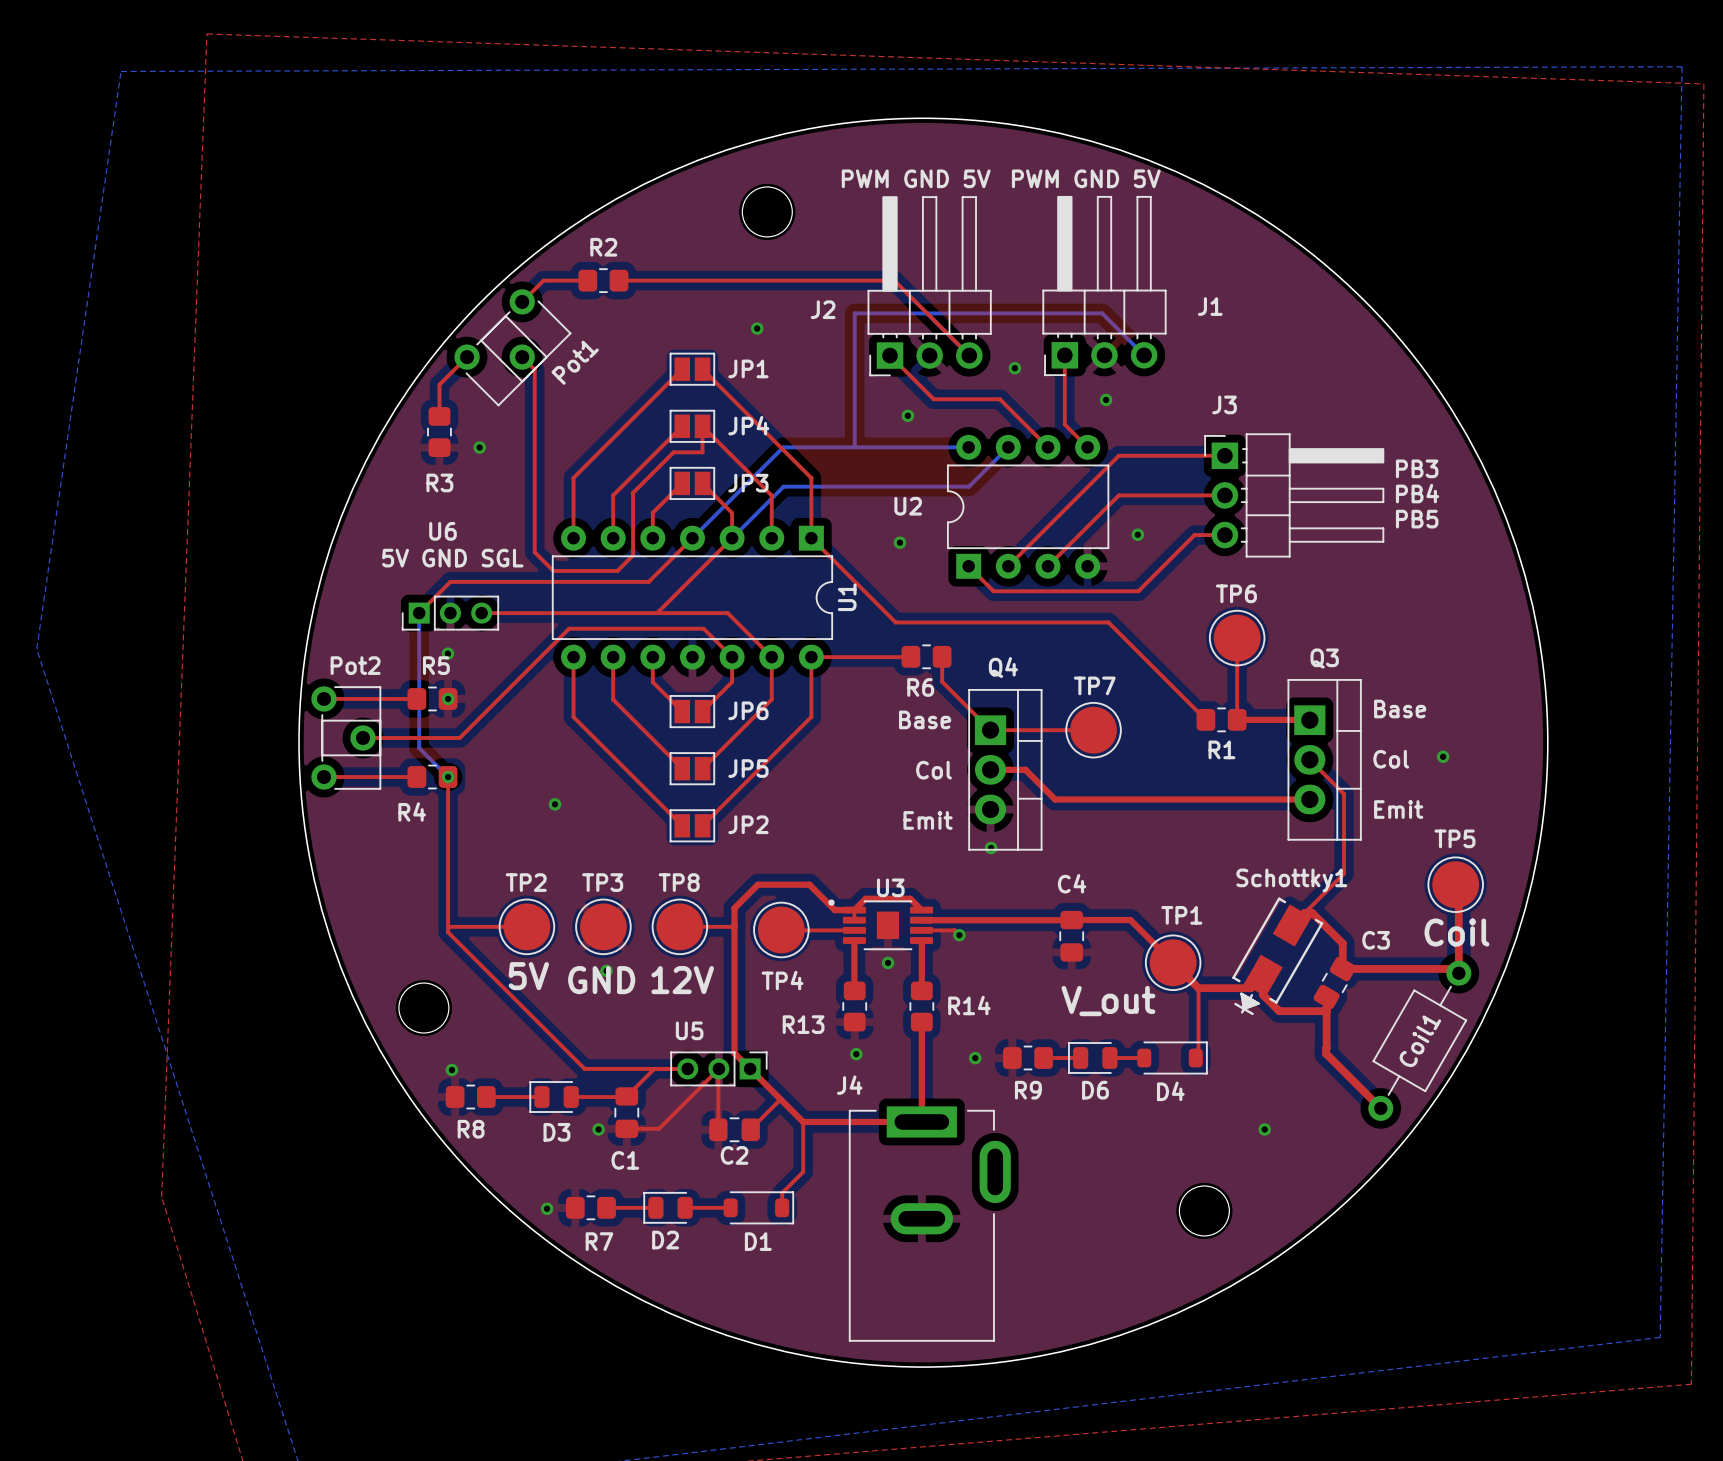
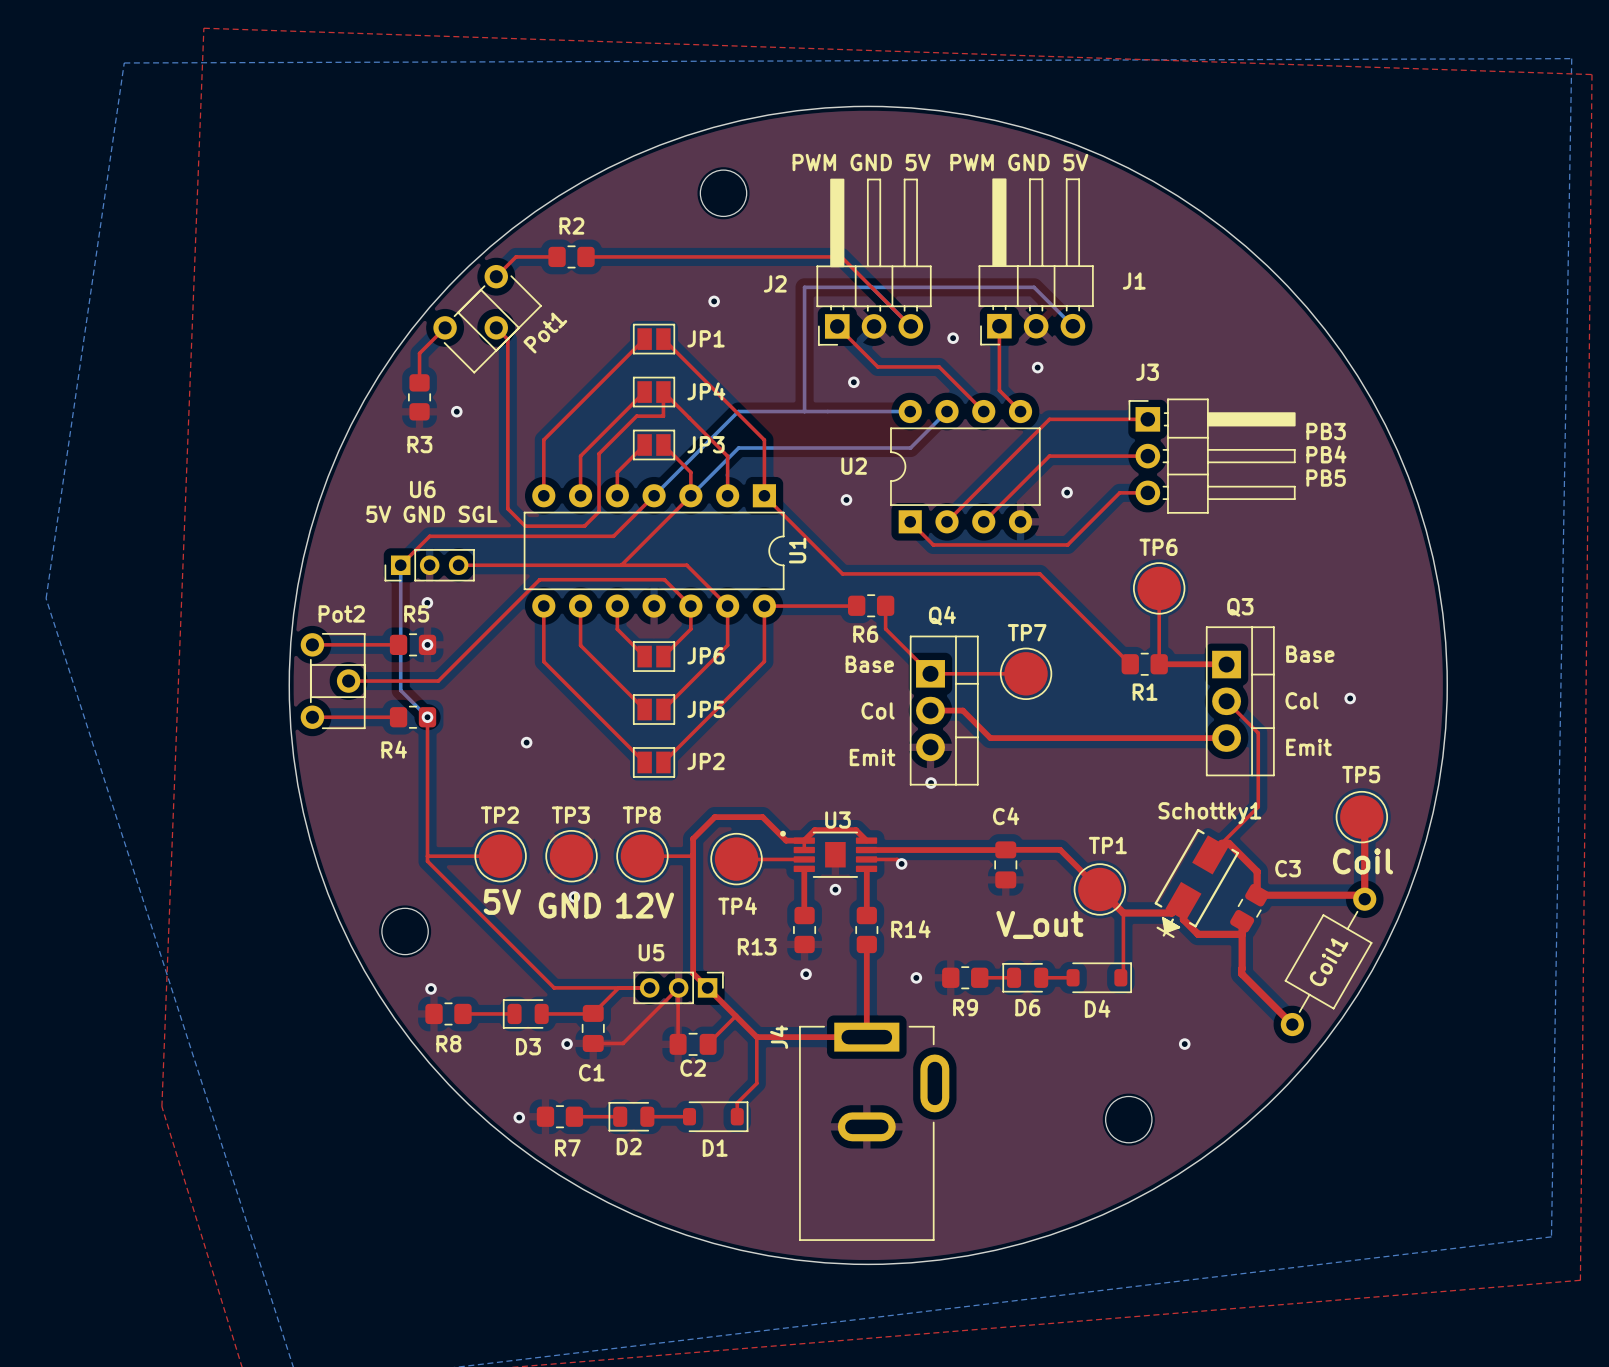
J4 name rotation: 0° (849, 1085) -> 90° counterclockwise (779, 1037)
J4 name position: J4 (849, 1085) -> J4 (779, 1037)

